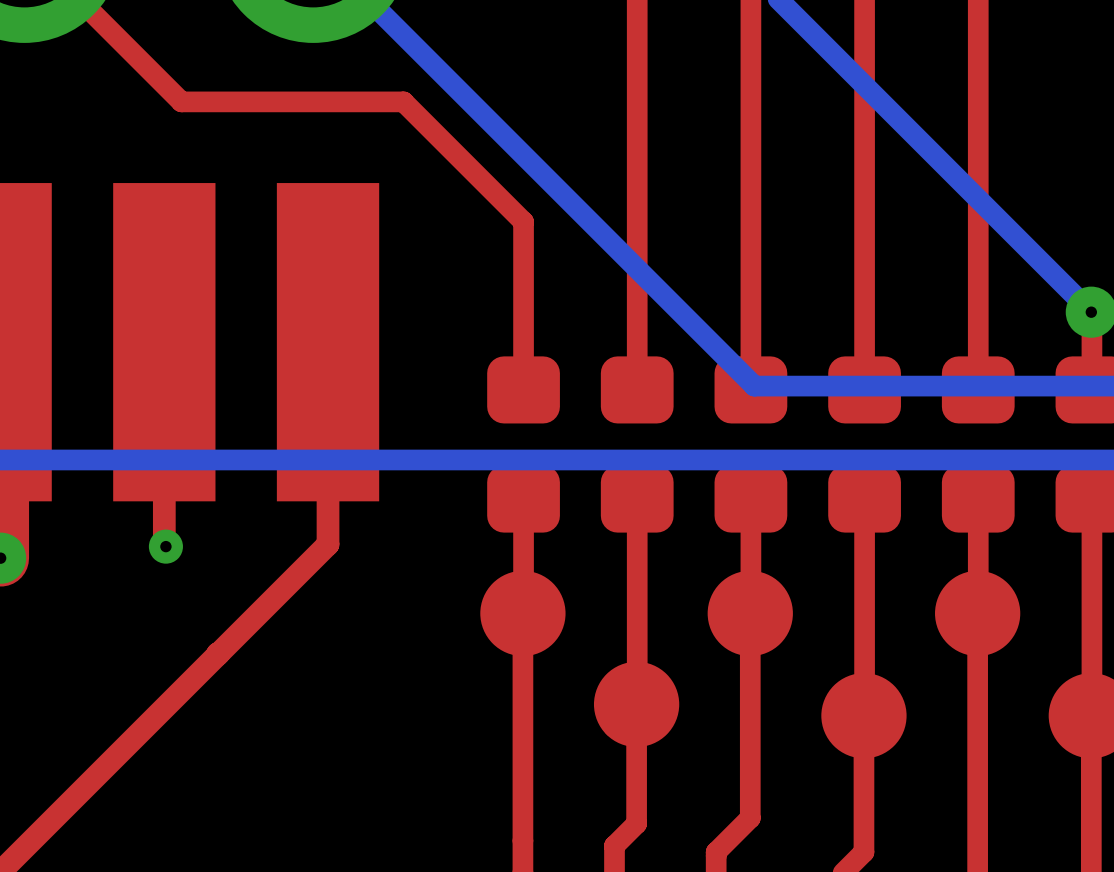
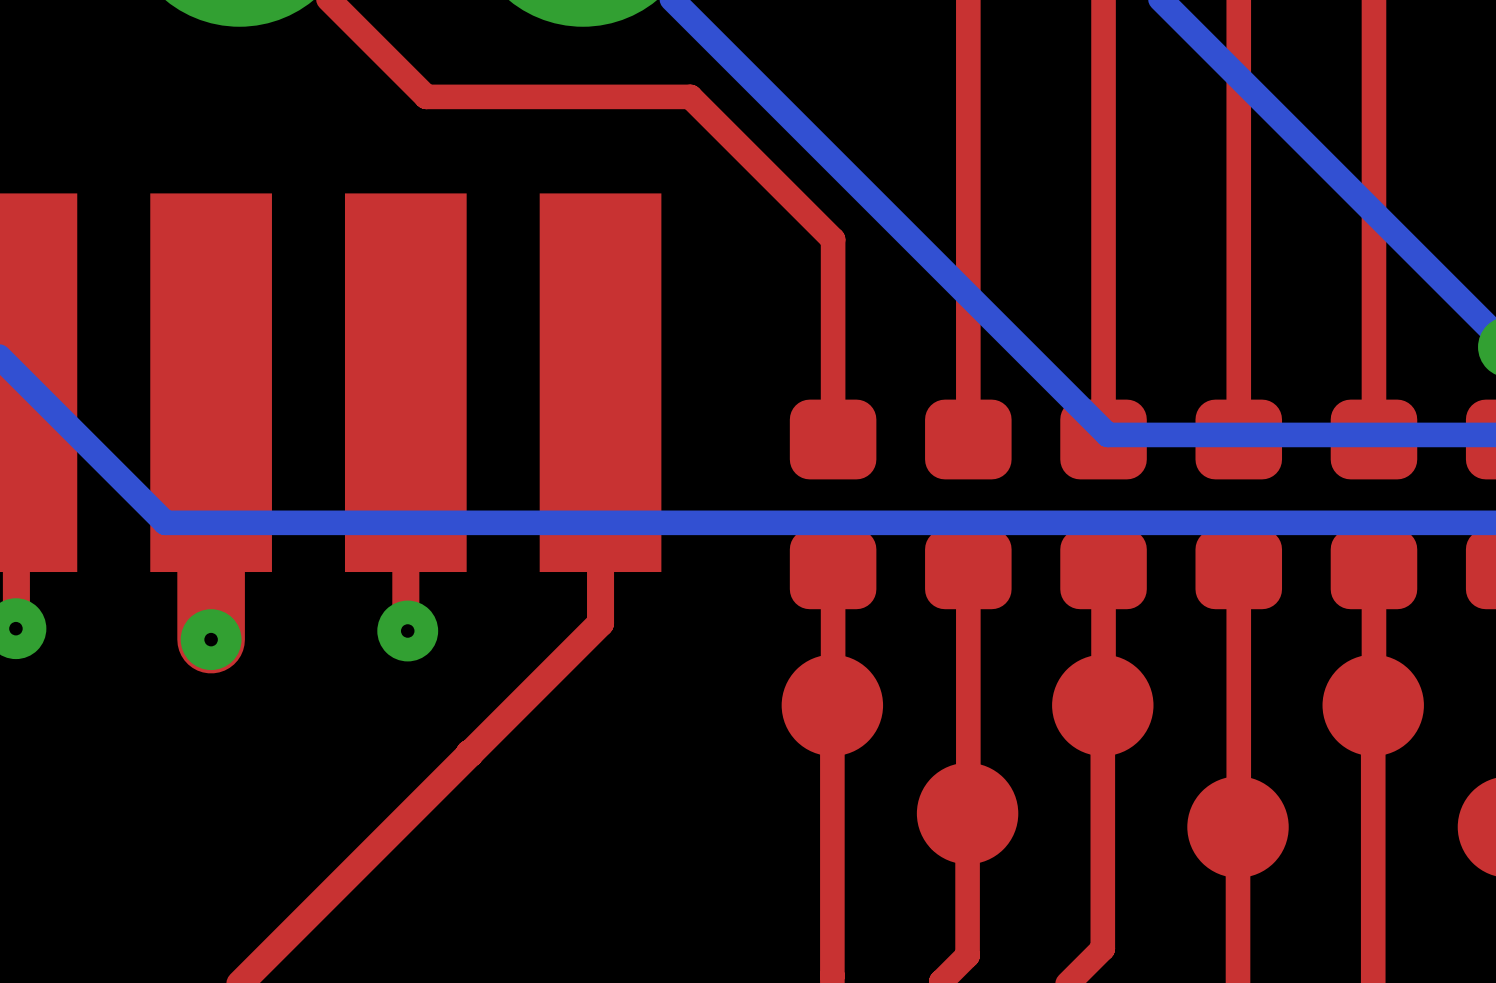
via size: [148, 529, 183, 564] -> [377, 600, 439, 662]

